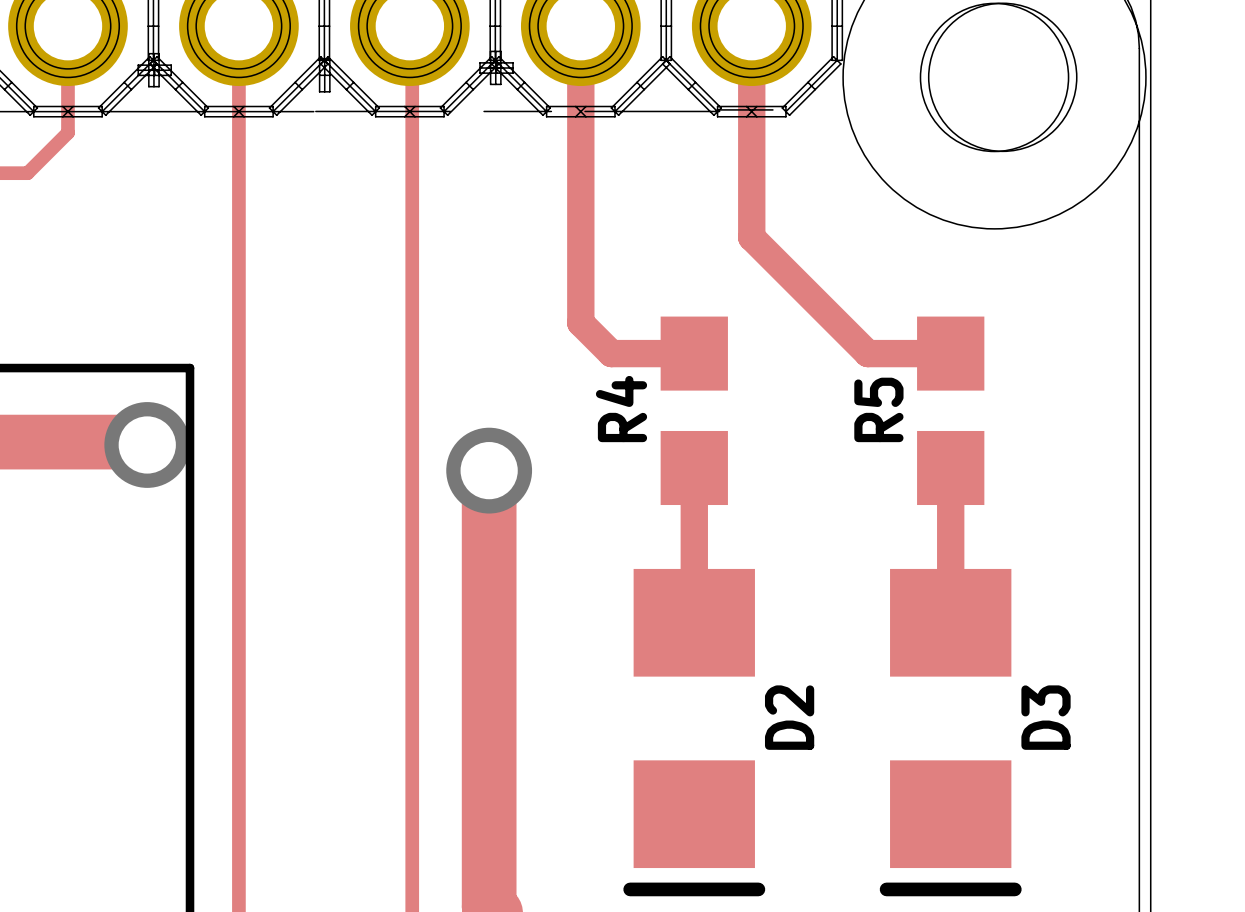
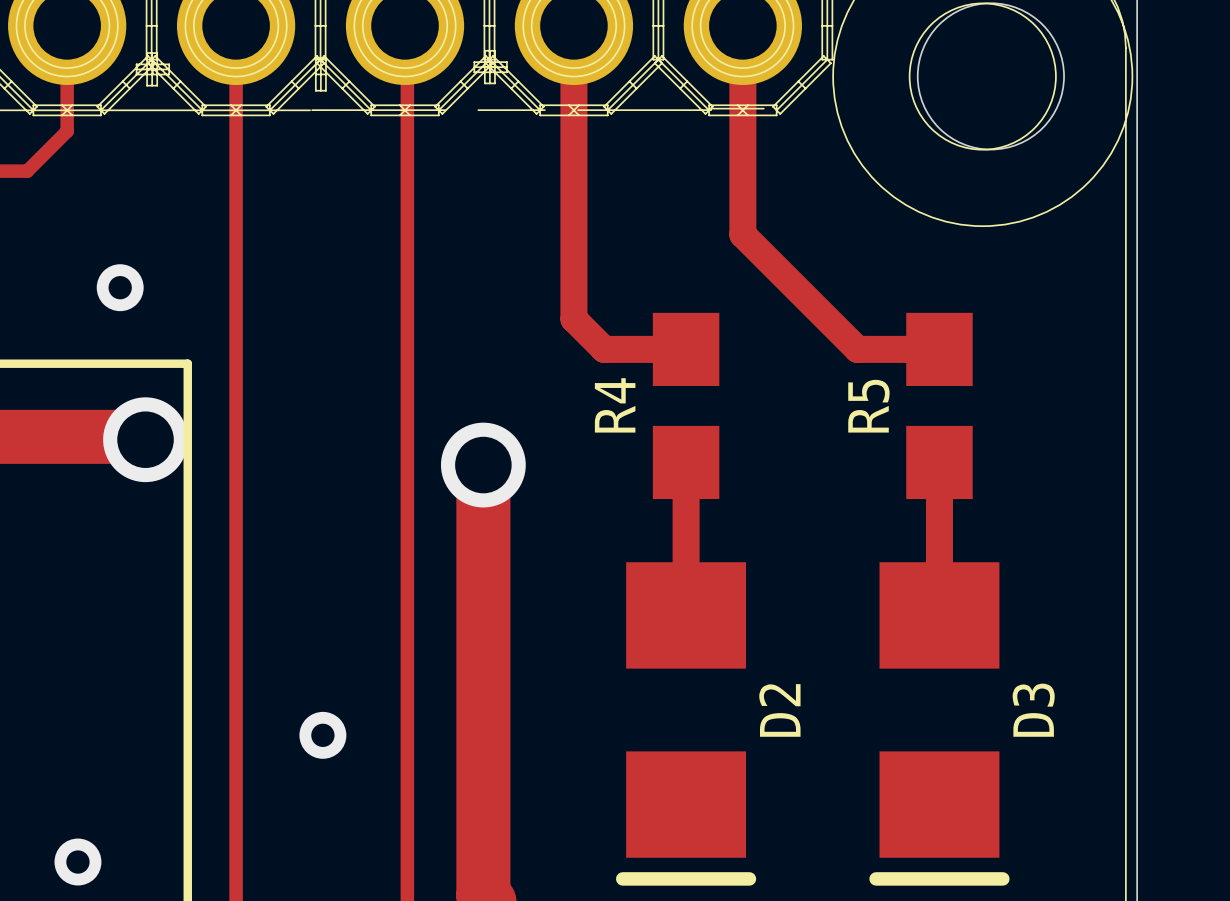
via: none -> (120, 287)
via: none -> (322, 735)
via: none -> (77, 862)

